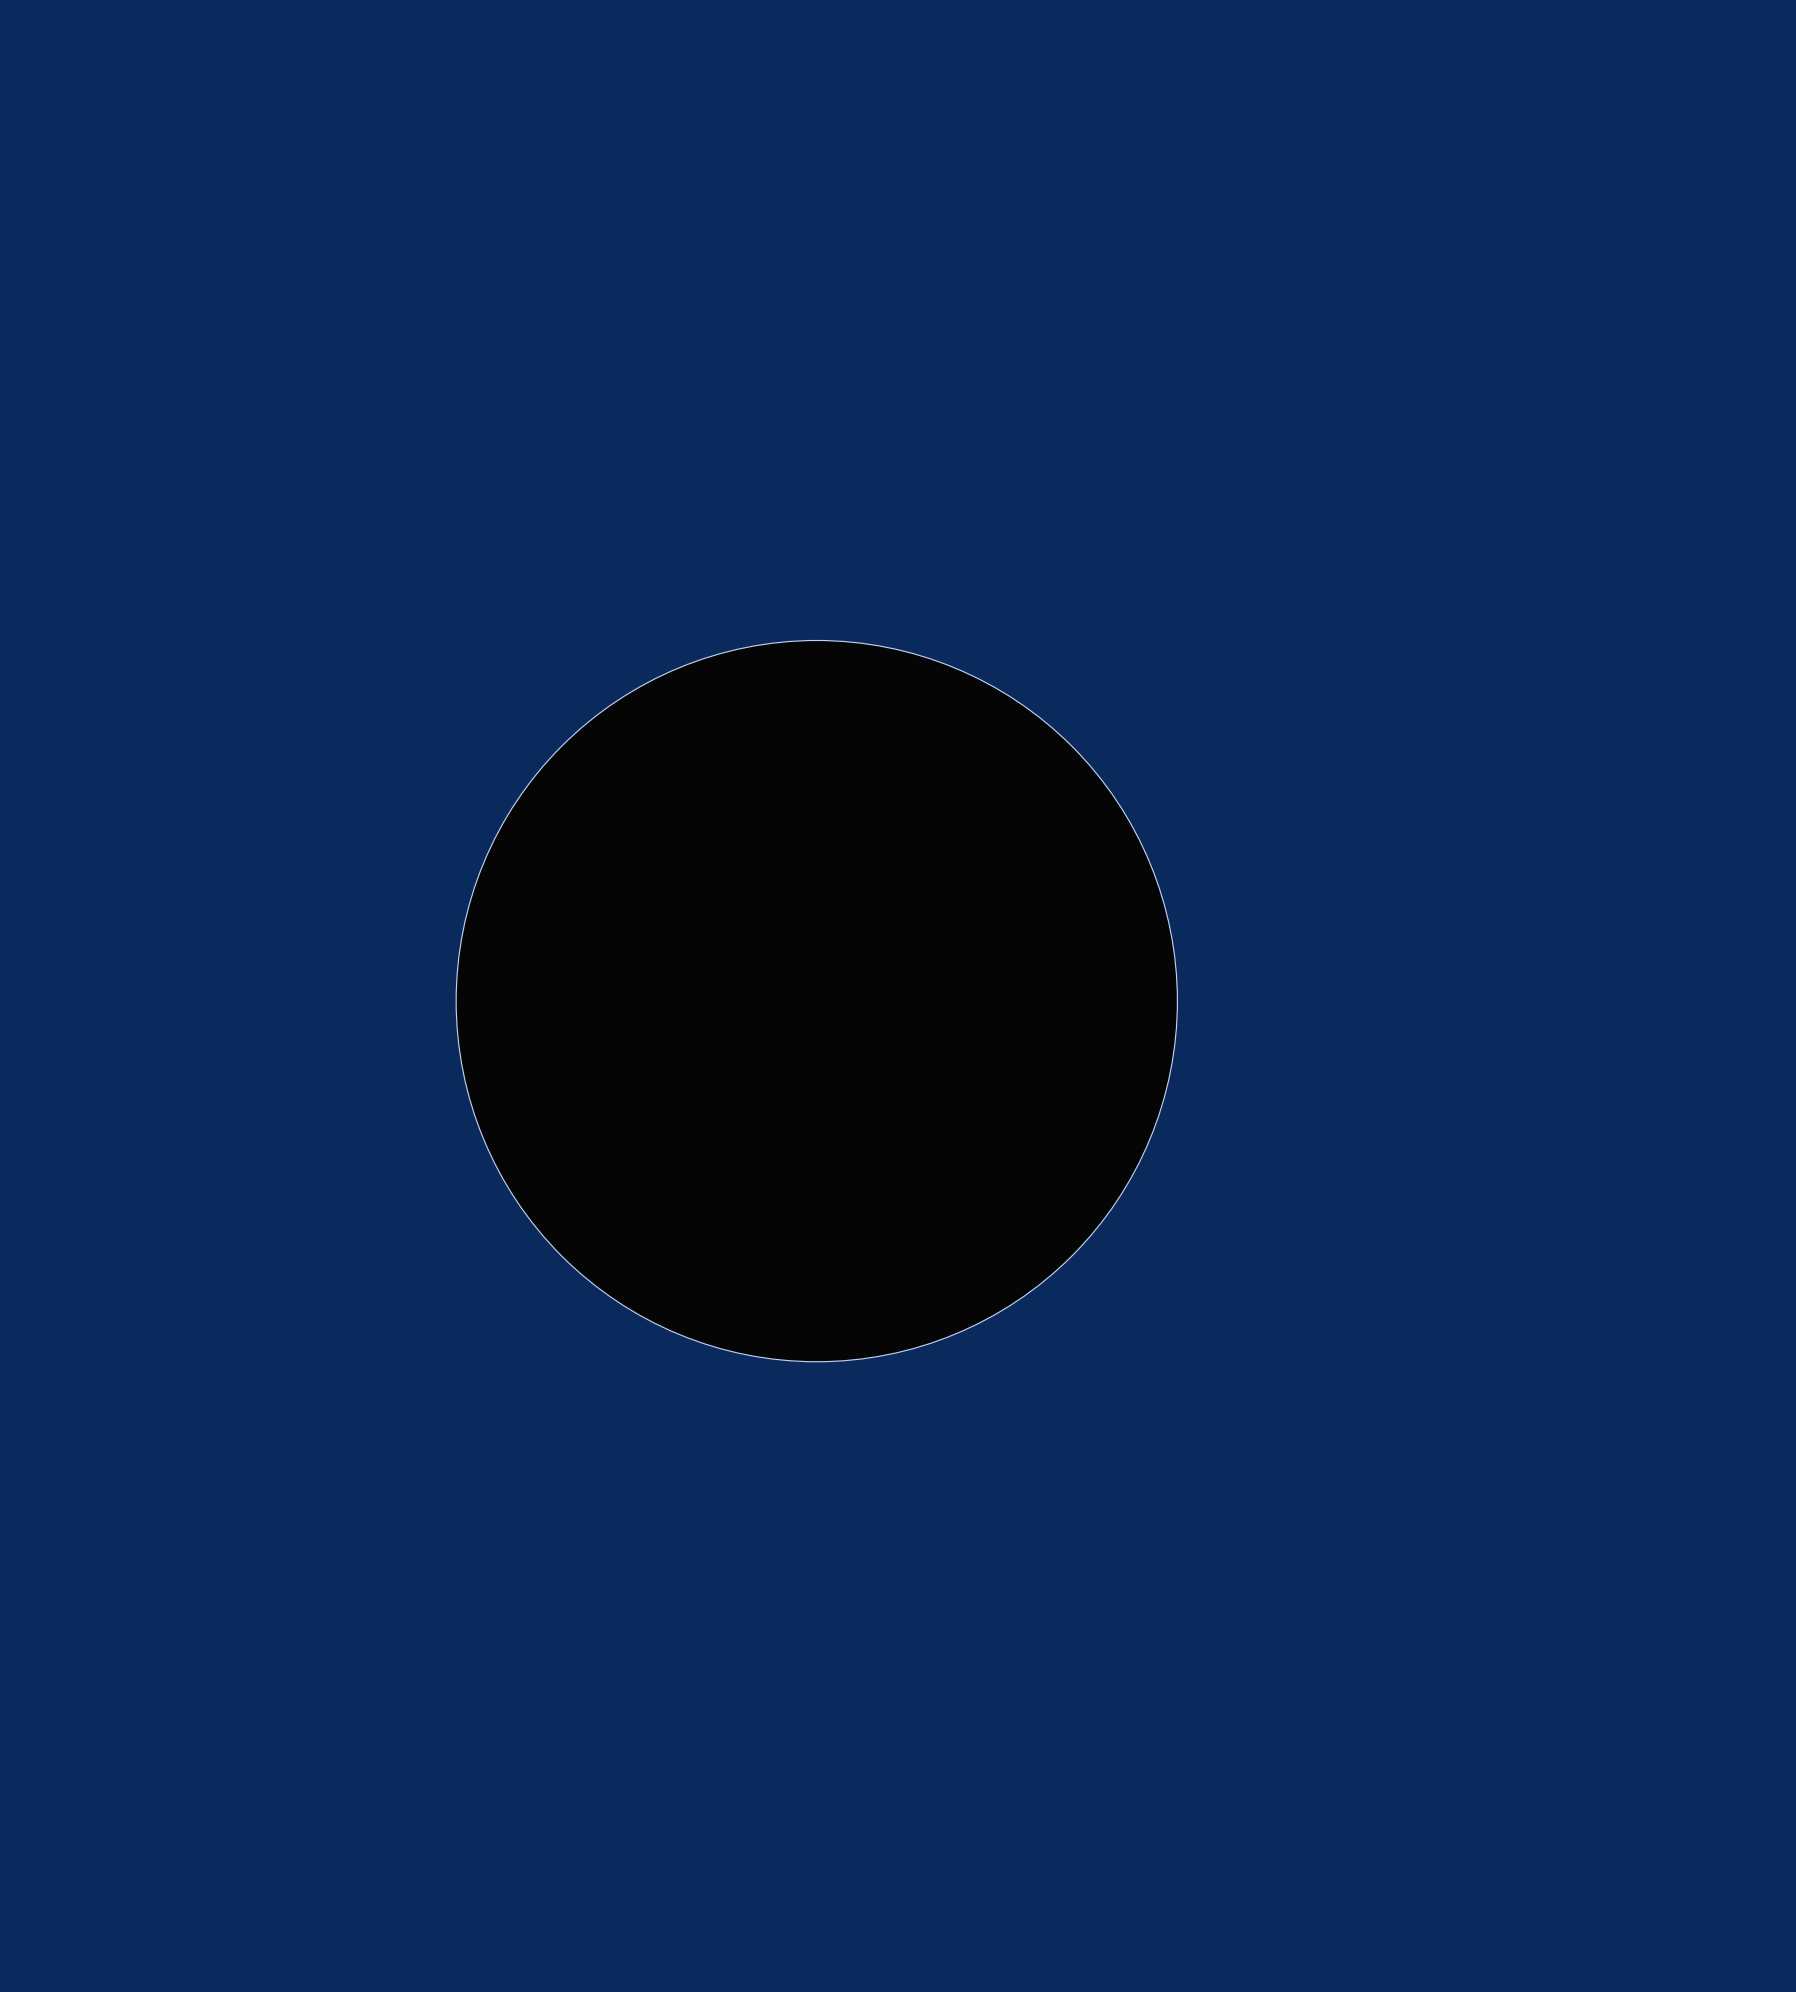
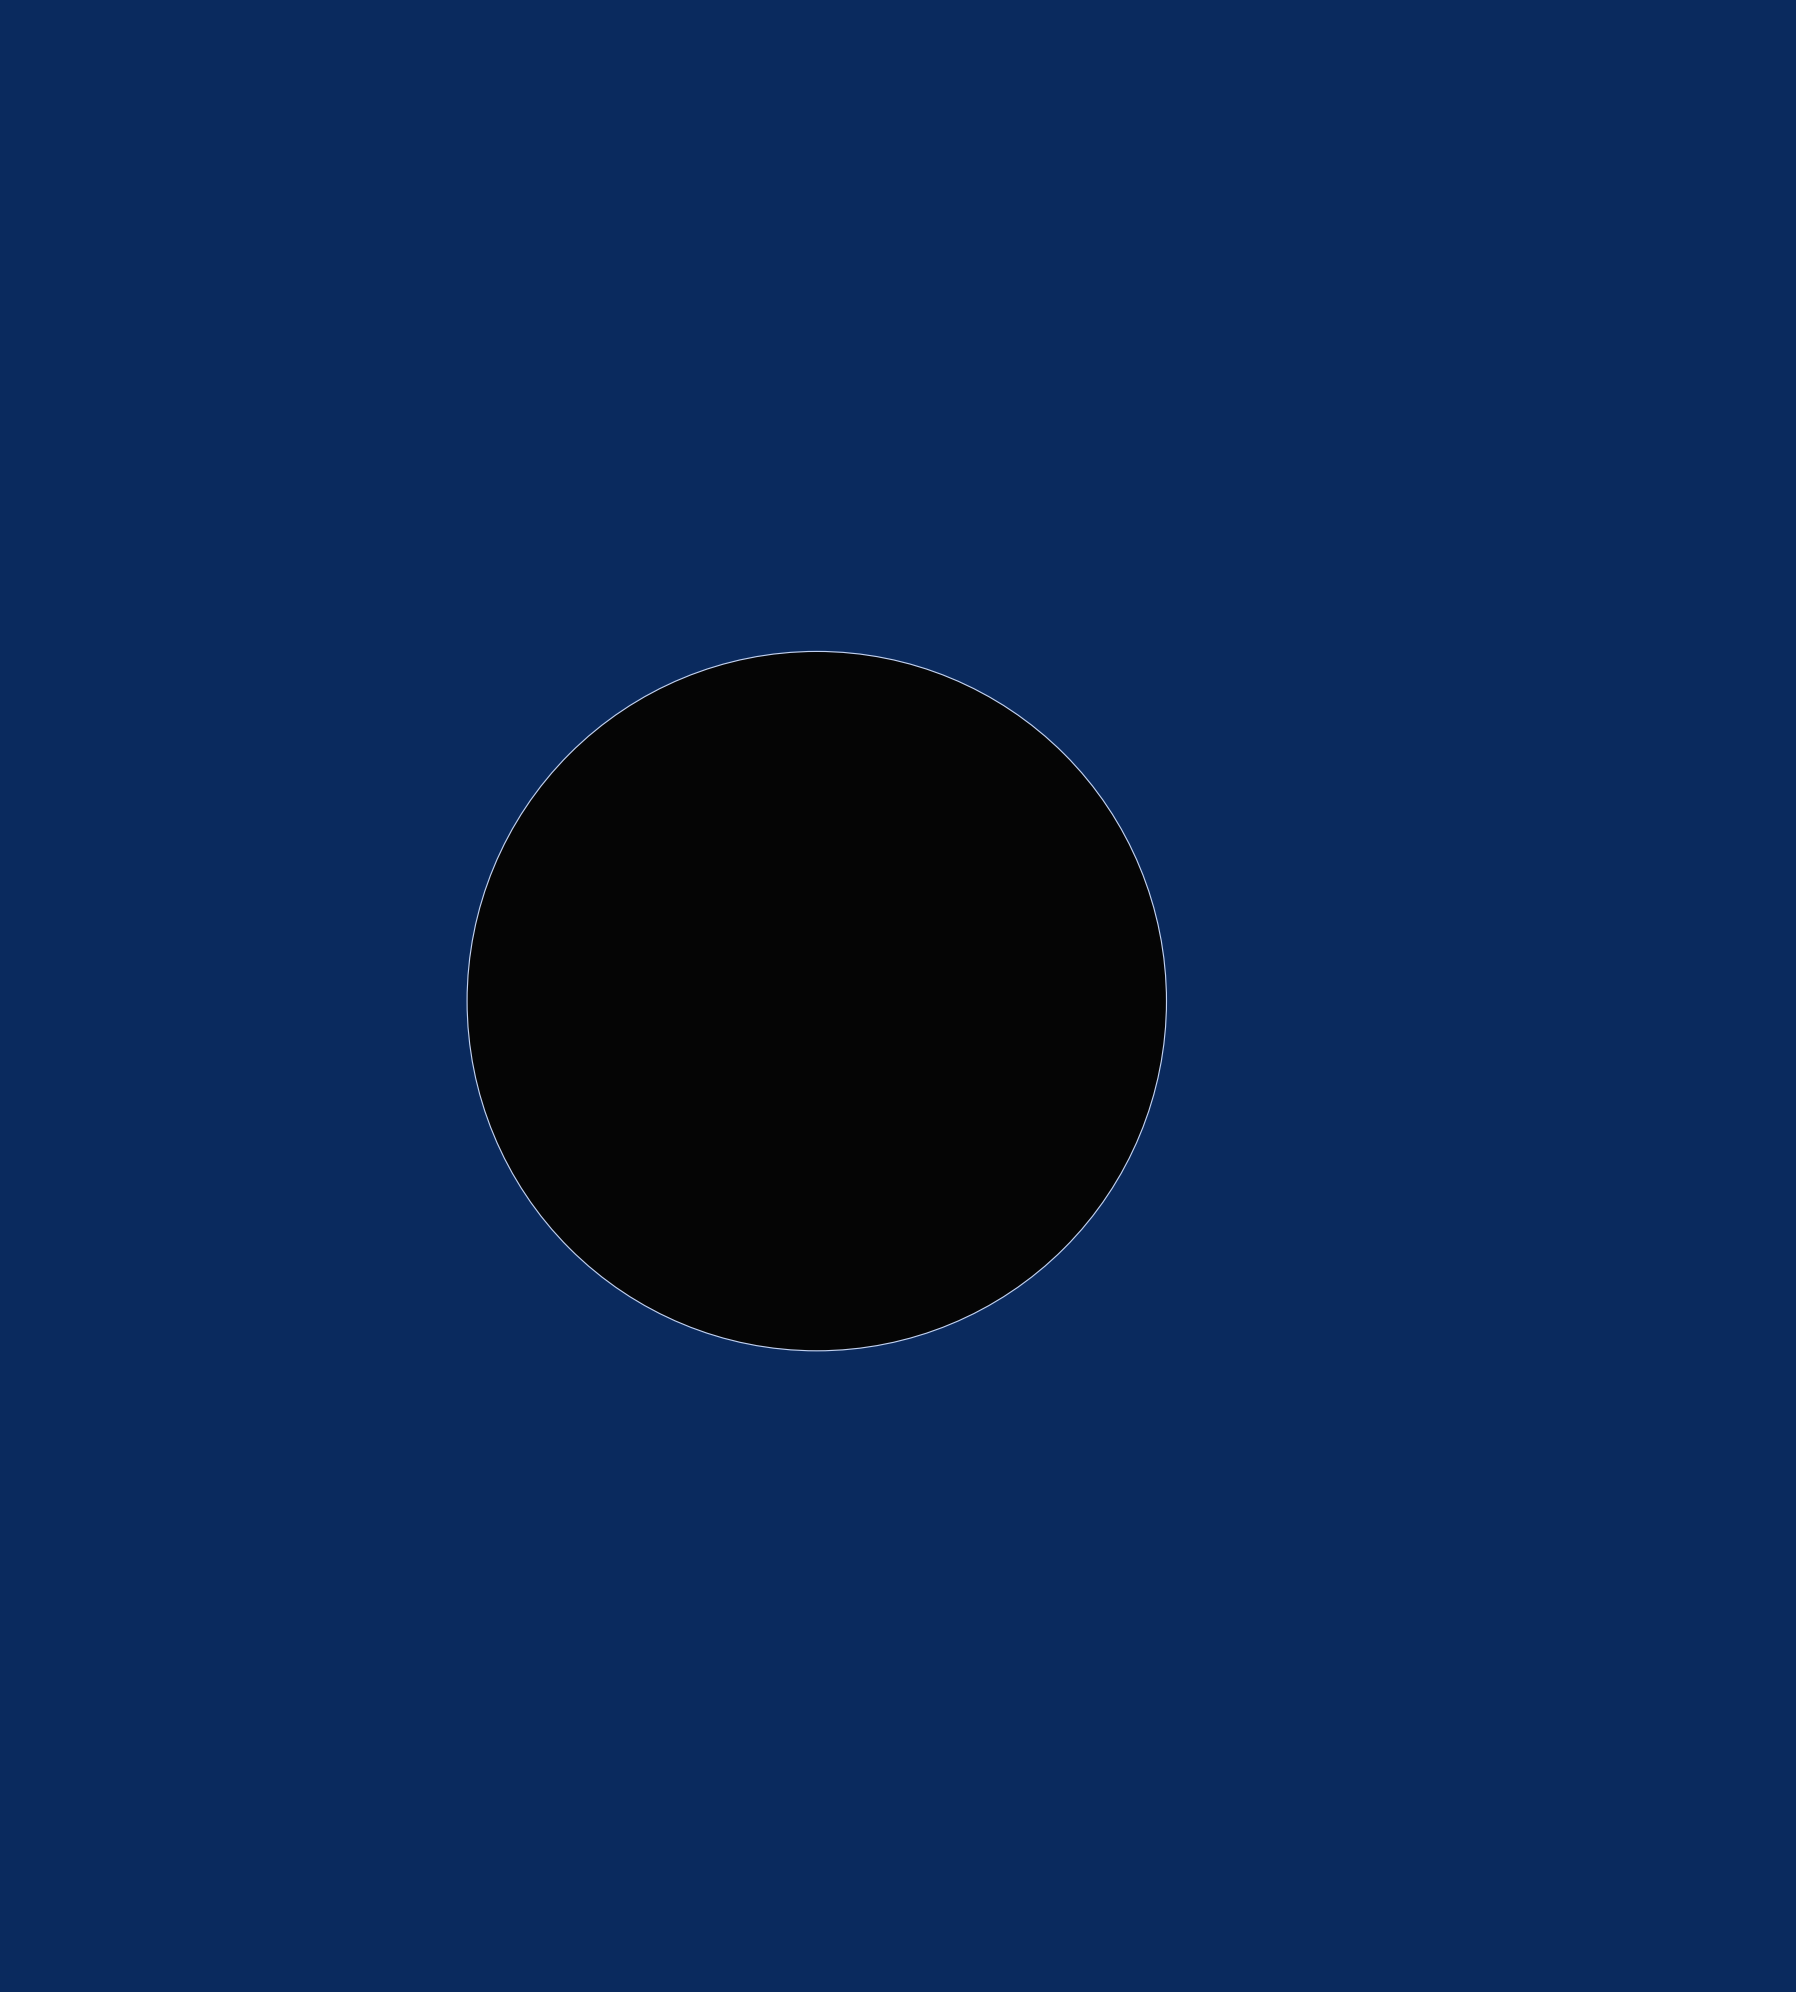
hole size: [456, 640, 1178, 1362] -> [467, 651, 1167, 1351]

